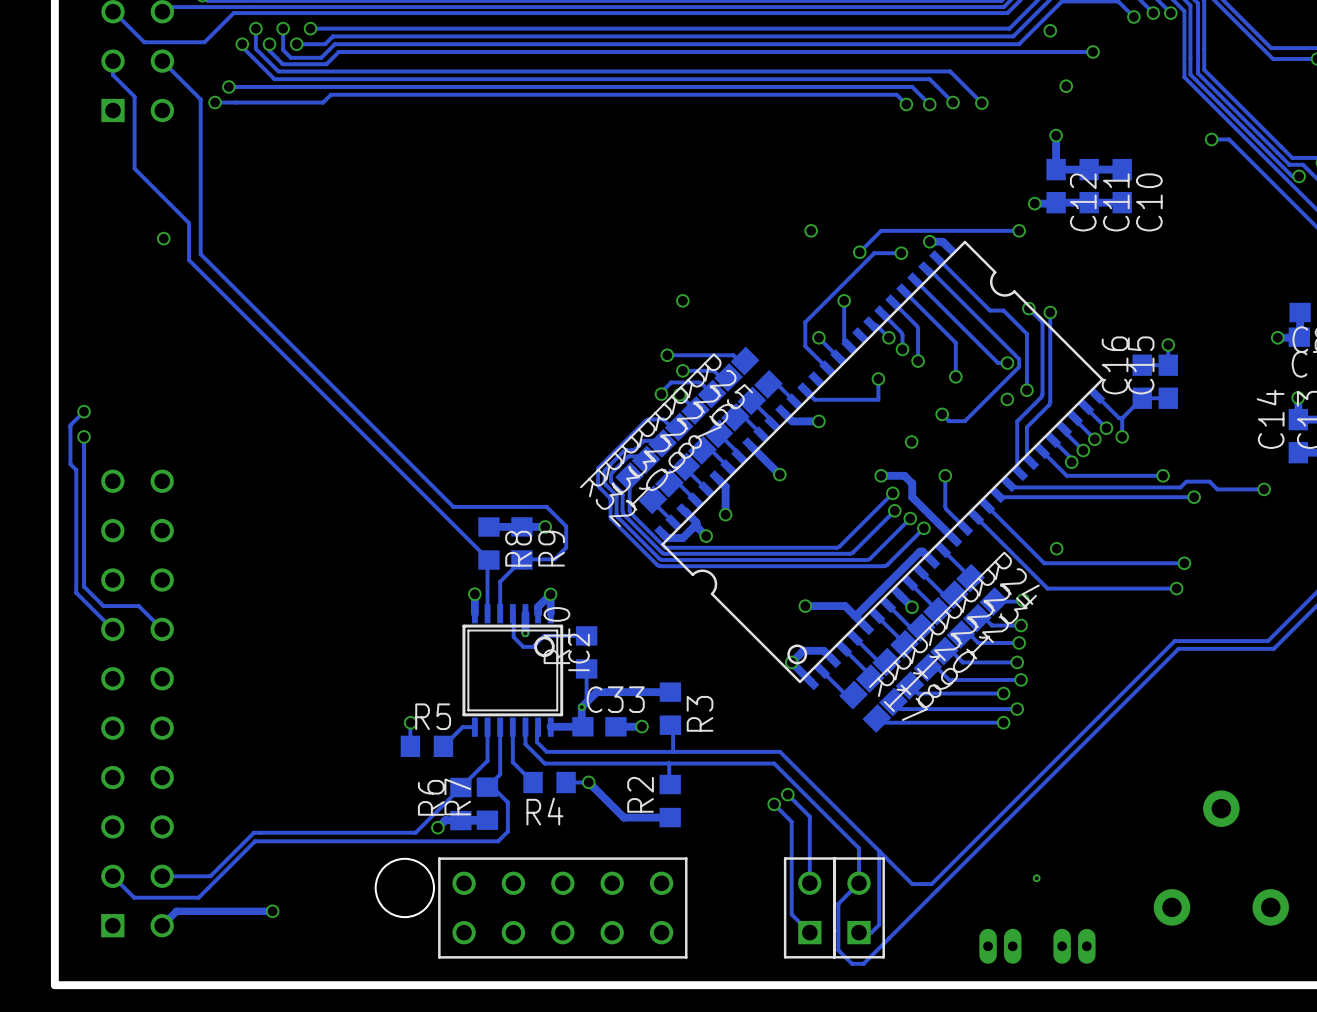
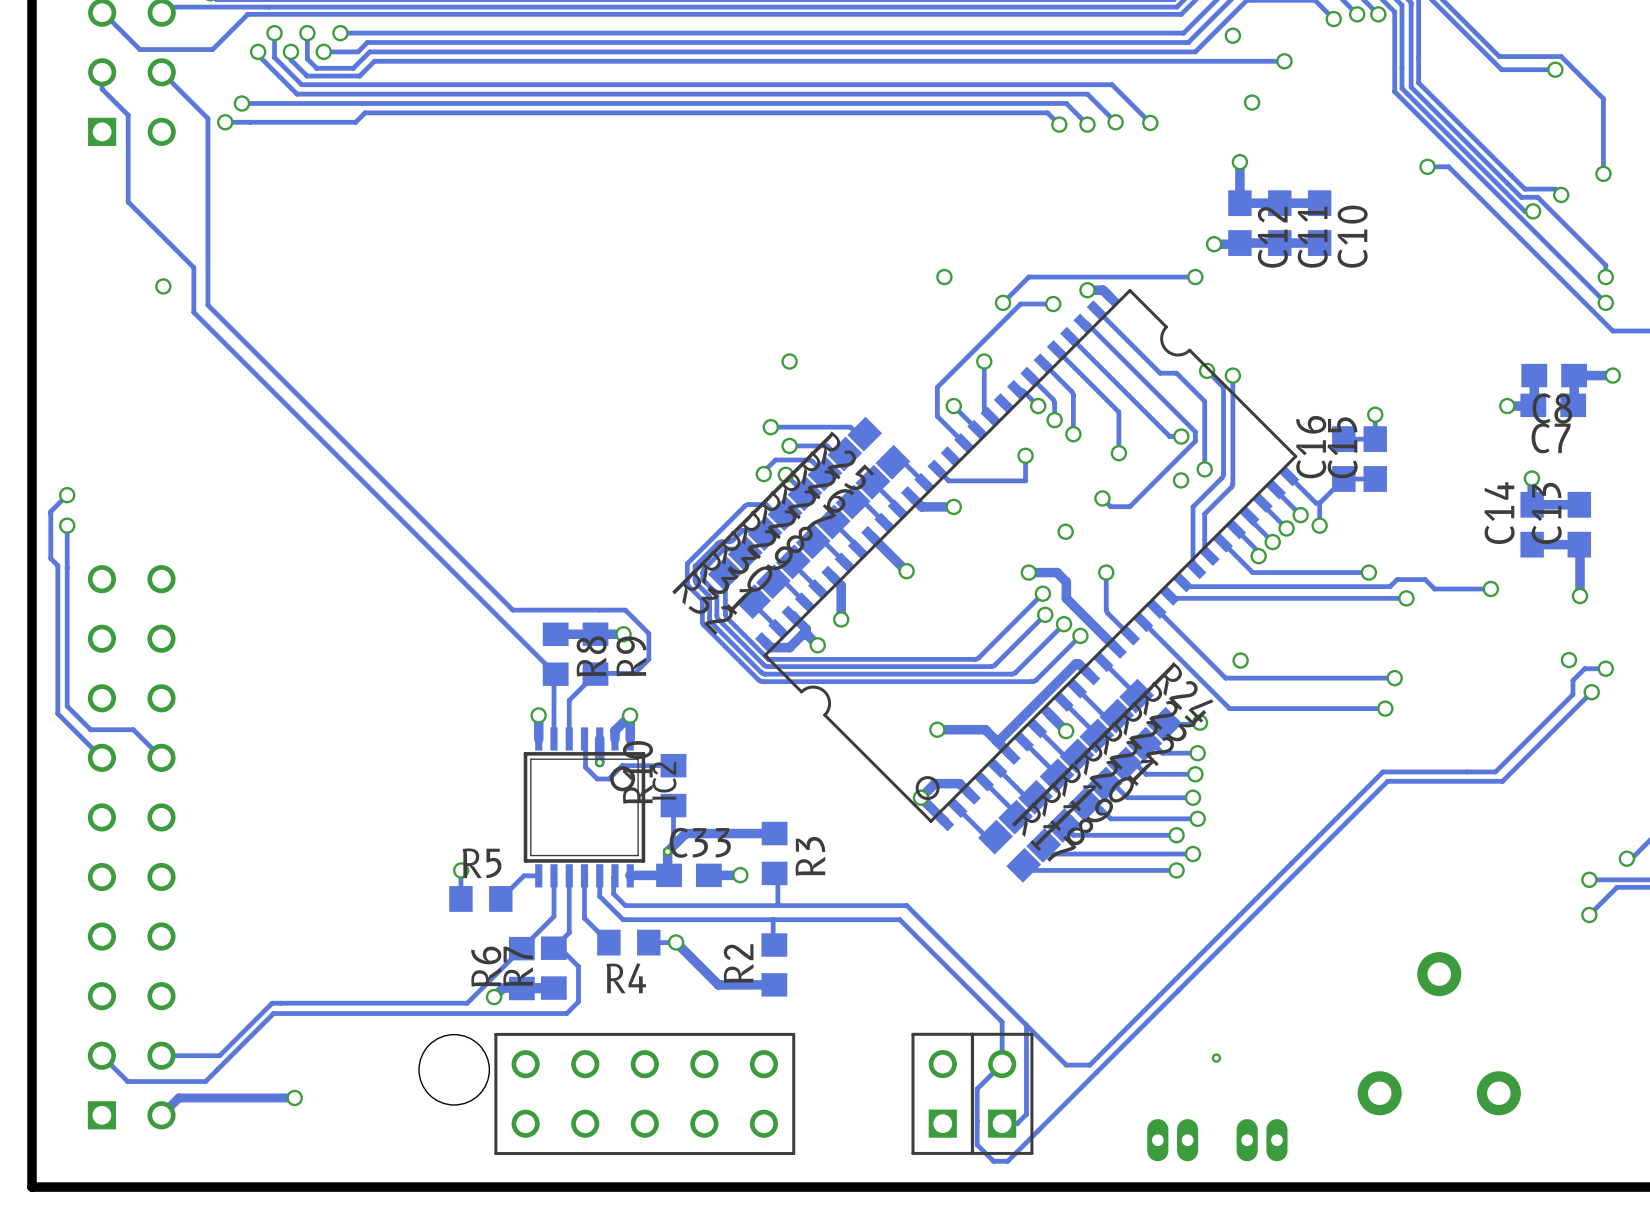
track: (787, 794) (809, 816) (809, 883) -> none
via: (787, 794) -> none
track: (774, 804) (791, 821) (791, 914) (809, 932) -> none
via: (774, 804) -> none

